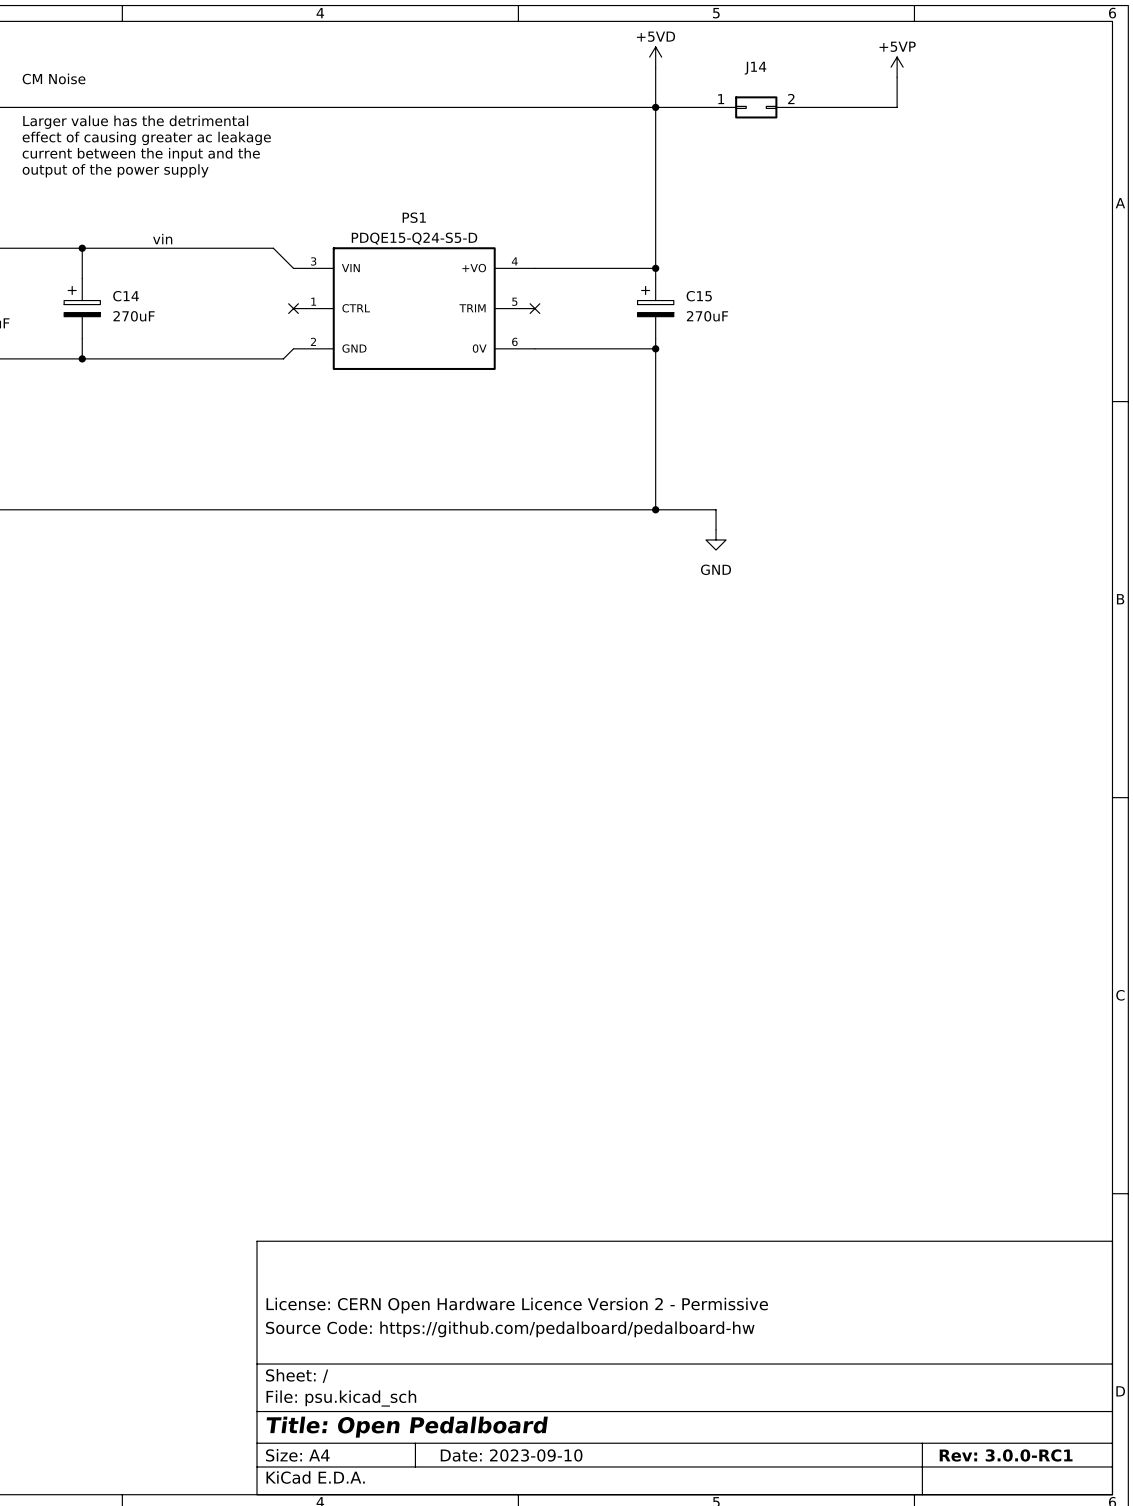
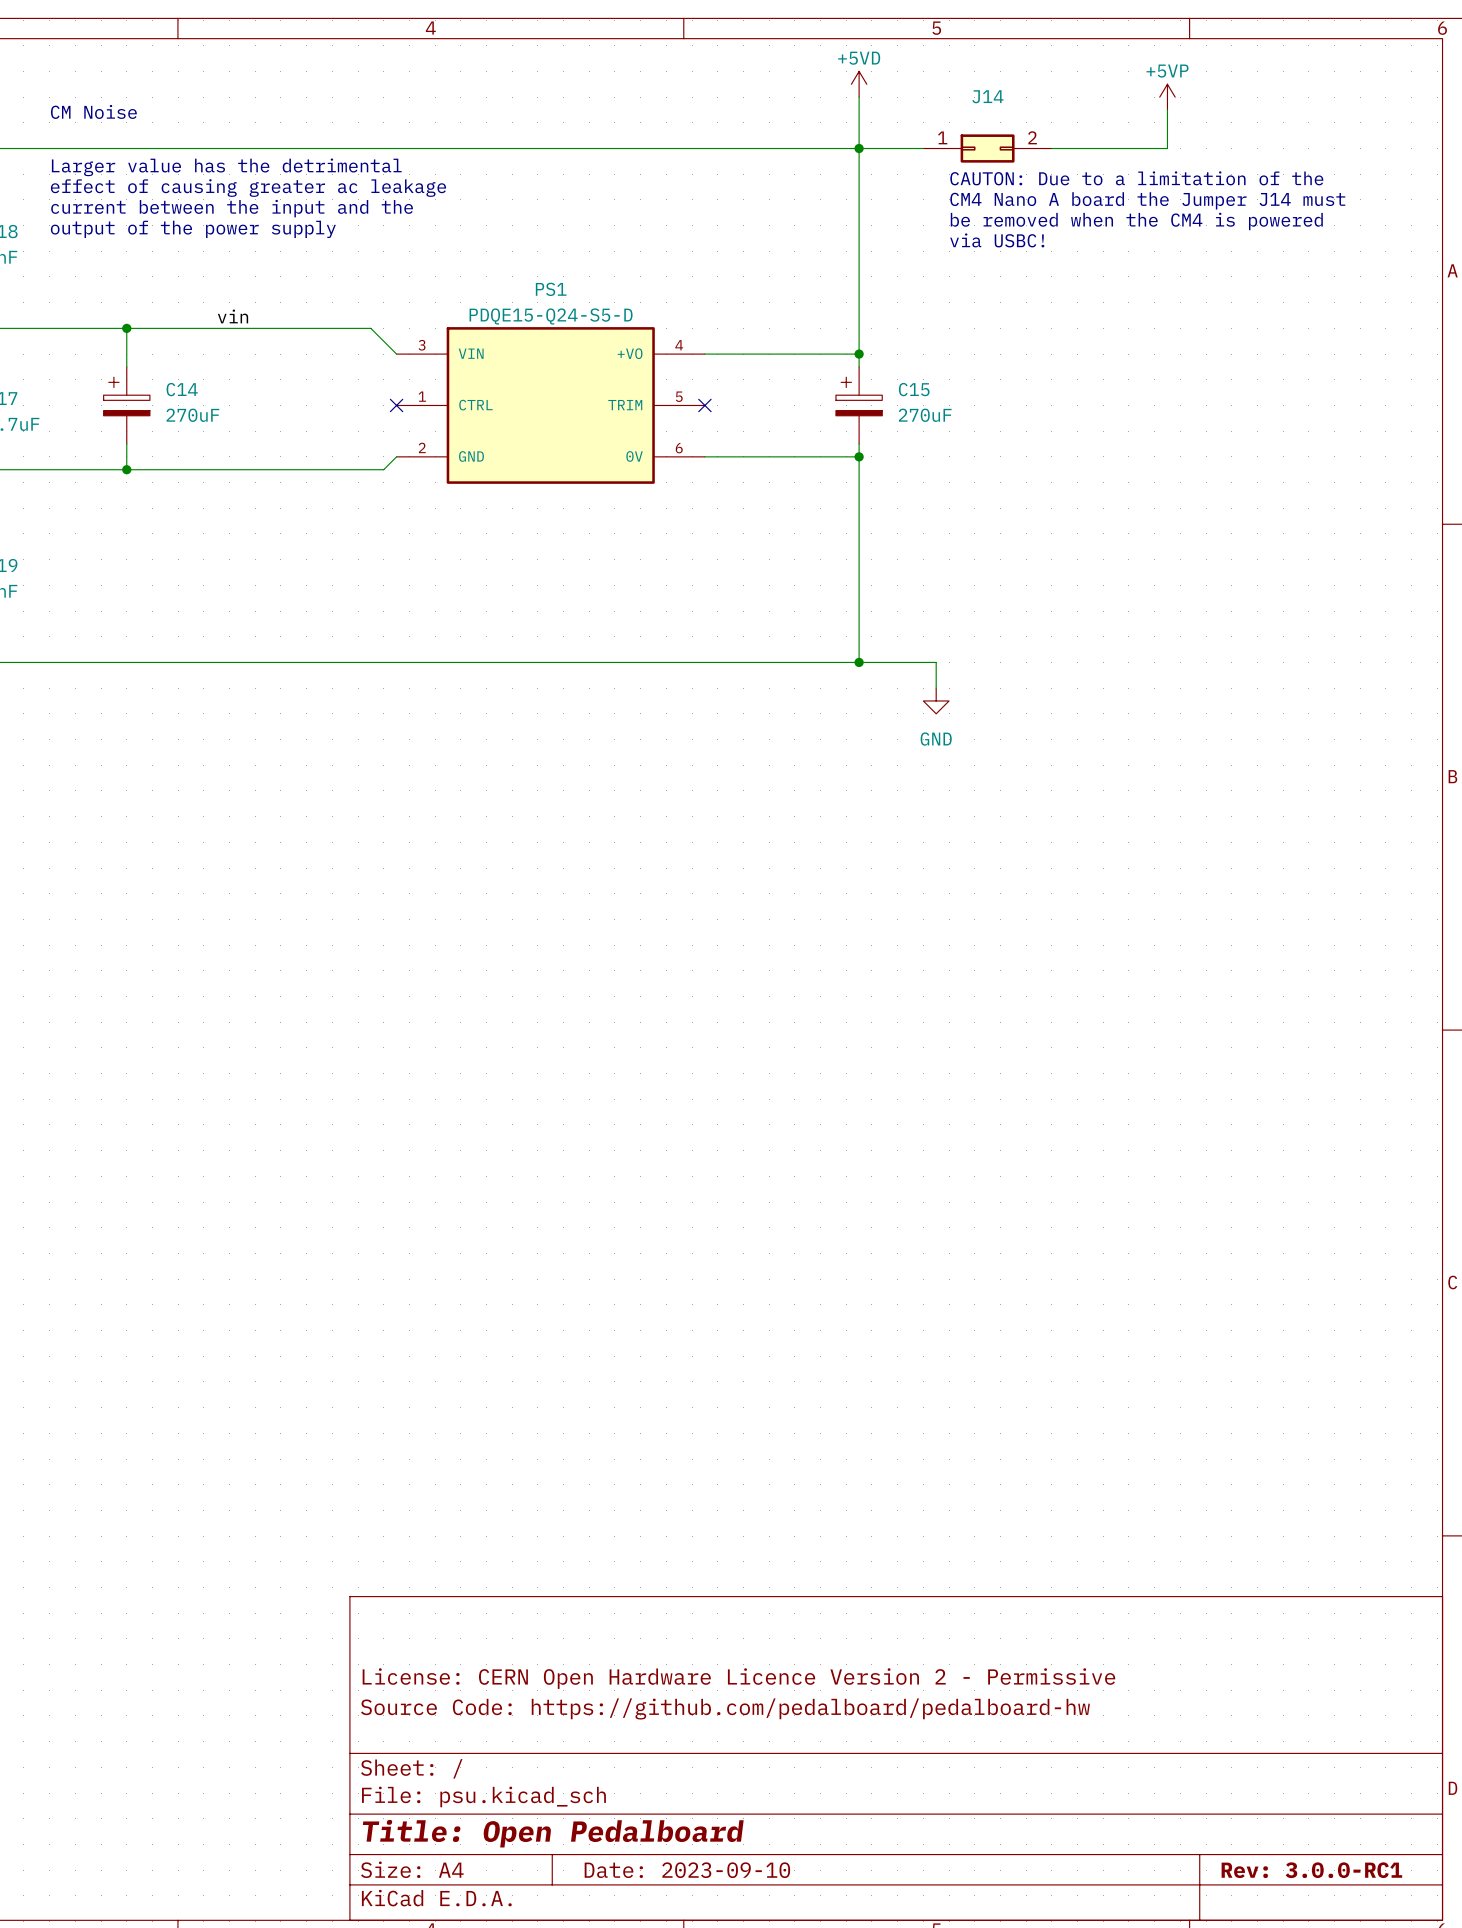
text: none -> CAUTON: Due to a limitation of the (1136, 178)
text: none -> CM4 Nano A board the Jumper J14 must (1147, 200)
text: none -> be removed when the CM4 is powered (1136, 221)
text: none -> via USBC! (997, 240)

